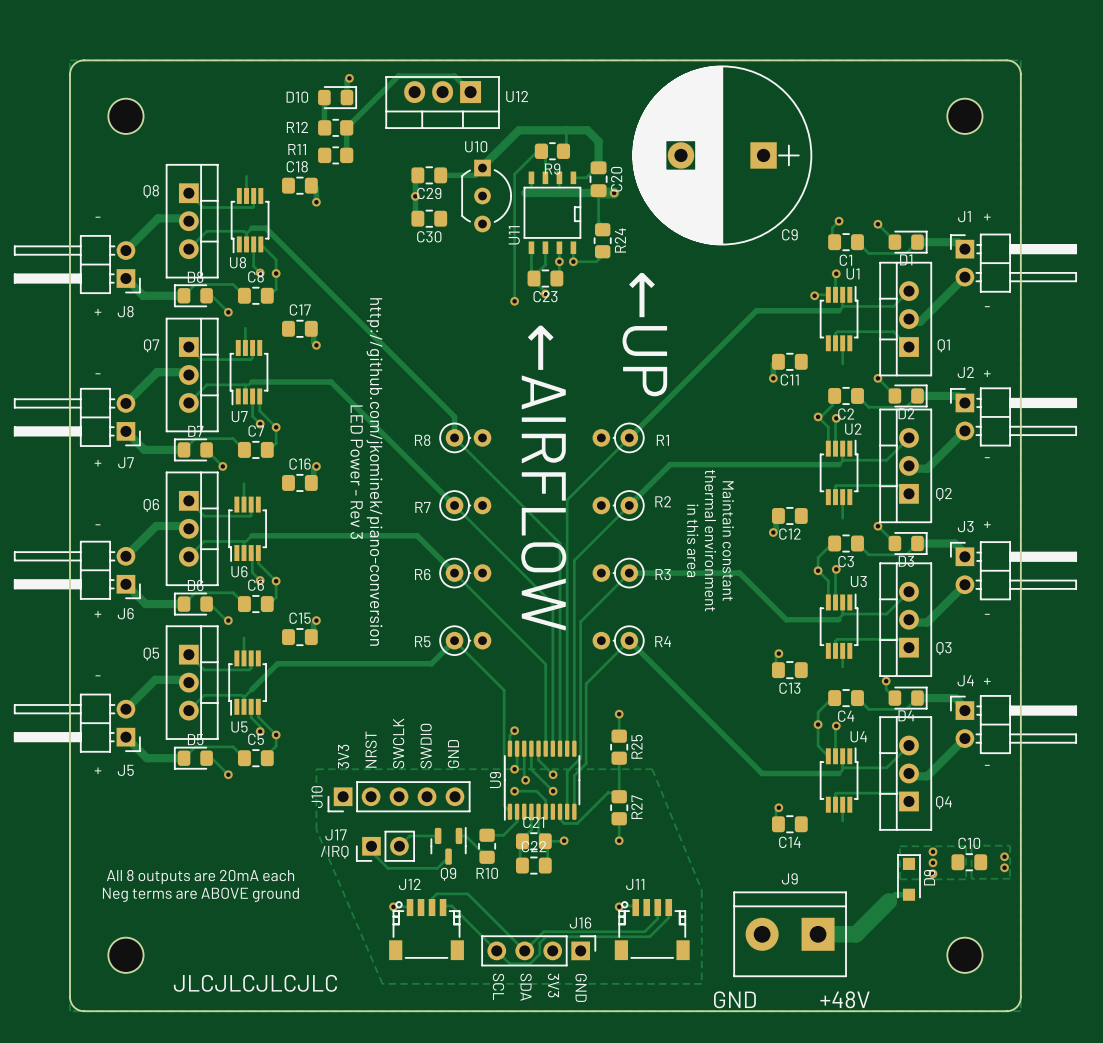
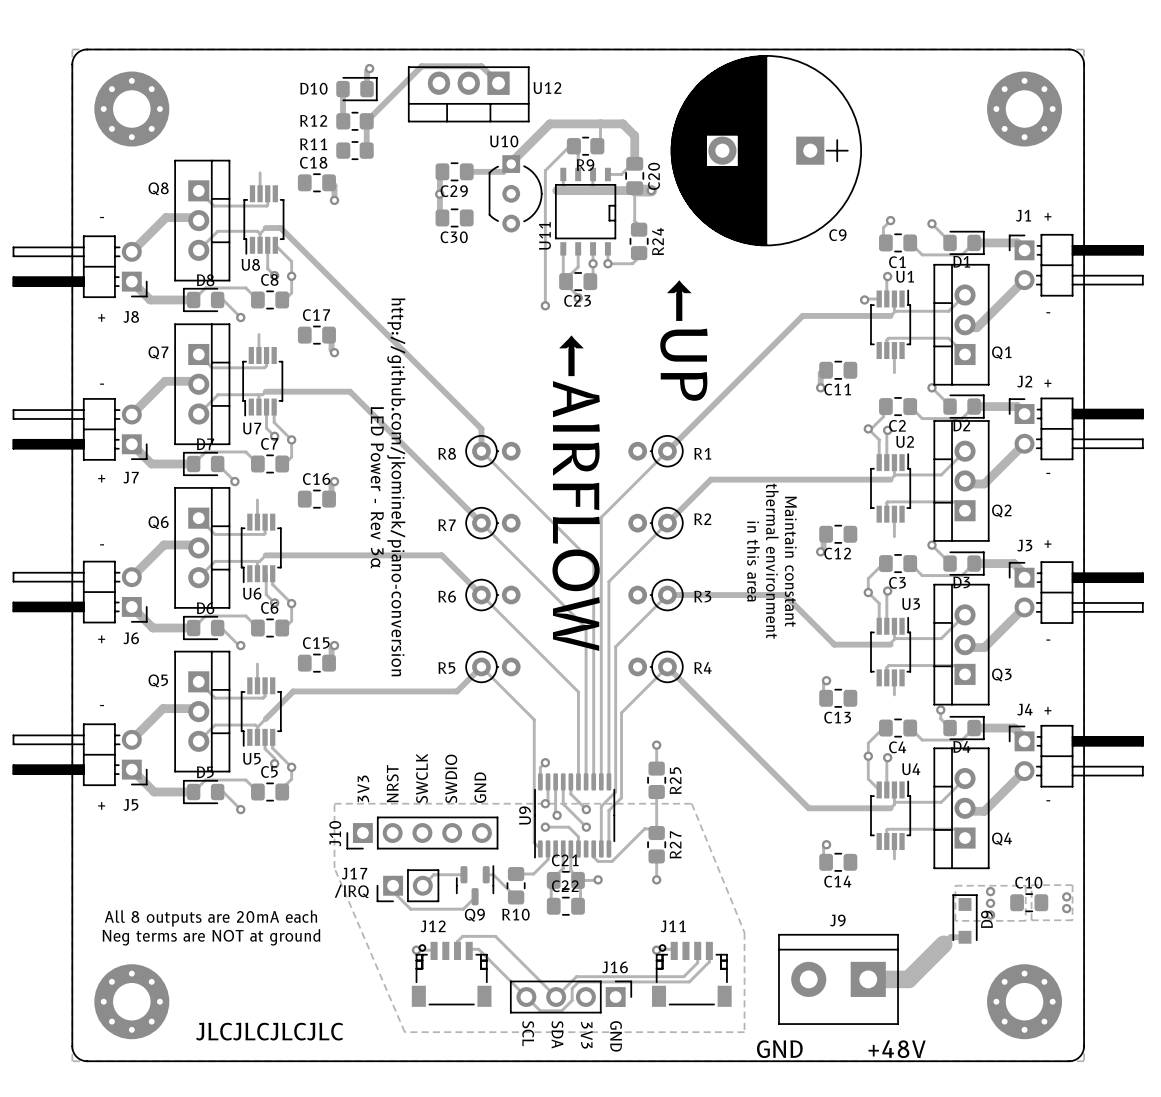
part footprint: [108, 98, 144, 134] -> [94, 71, 170, 147]
part footprint: [947, 98, 983, 134] -> [987, 71, 1063, 147]
text: LED Power - Rev 3 (356, 472) -> LED Power - Rev 3α (377, 487)
text: in this area (692, 540) -> none
text: thermal environment (710, 540) -> in this area (753, 561)
text: Maintain constant (728, 541) -> thermal environment (772, 561)
text: none -> Maintain constant (790, 561)
text: Neg terms are ABOVE ground (200, 894) -> Neg terms are NOT at ground (211, 937)
part footprint: [108, 937, 144, 973] -> [94, 964, 170, 1040]
part footprint: [947, 937, 983, 973] -> [987, 964, 1063, 1040]

